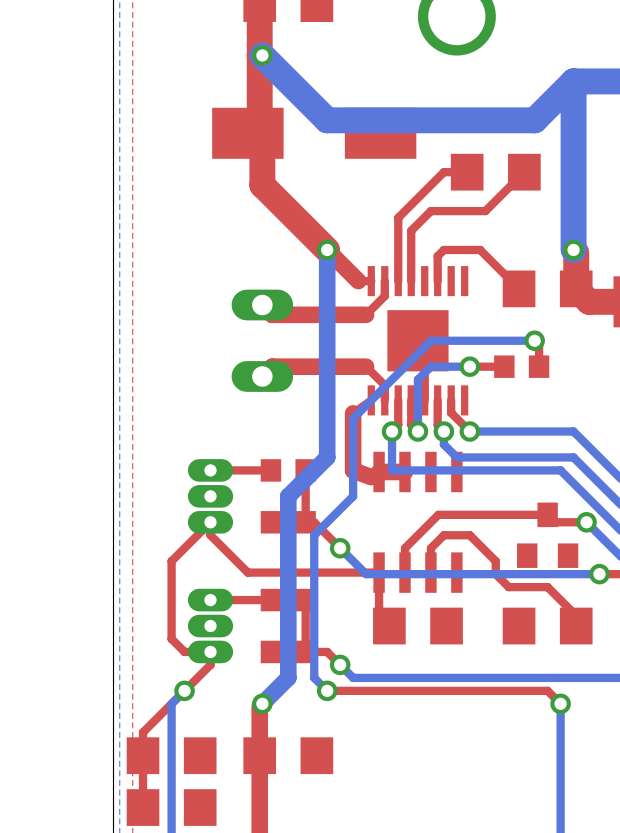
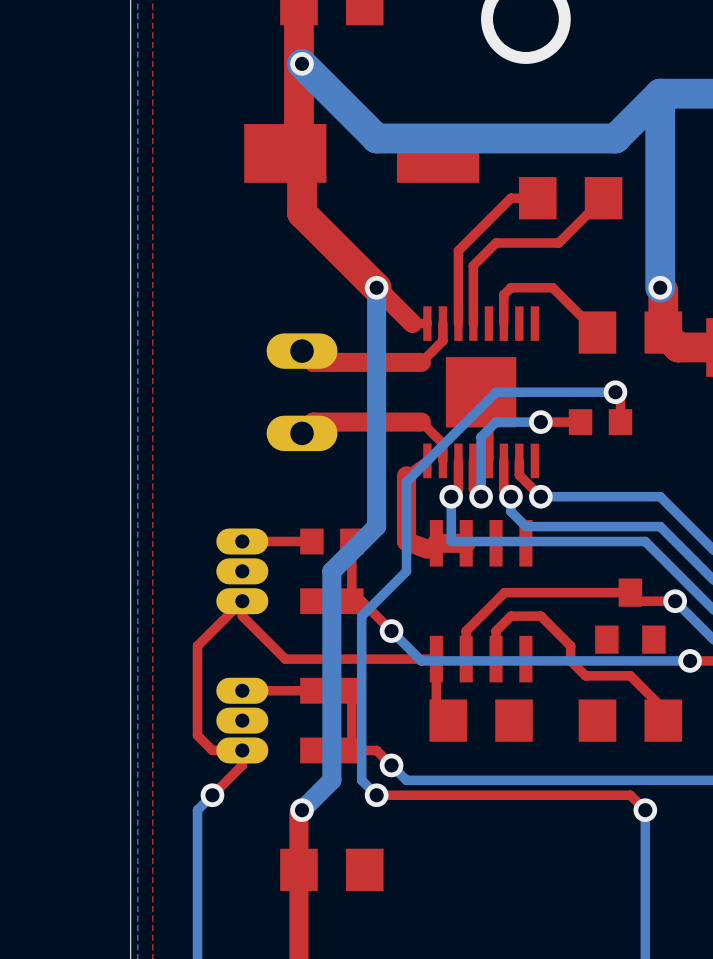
top track: (184, 690) (143, 732) (143, 807) -> none
part: (171, 755) -> none
part: (171, 807) -> none

